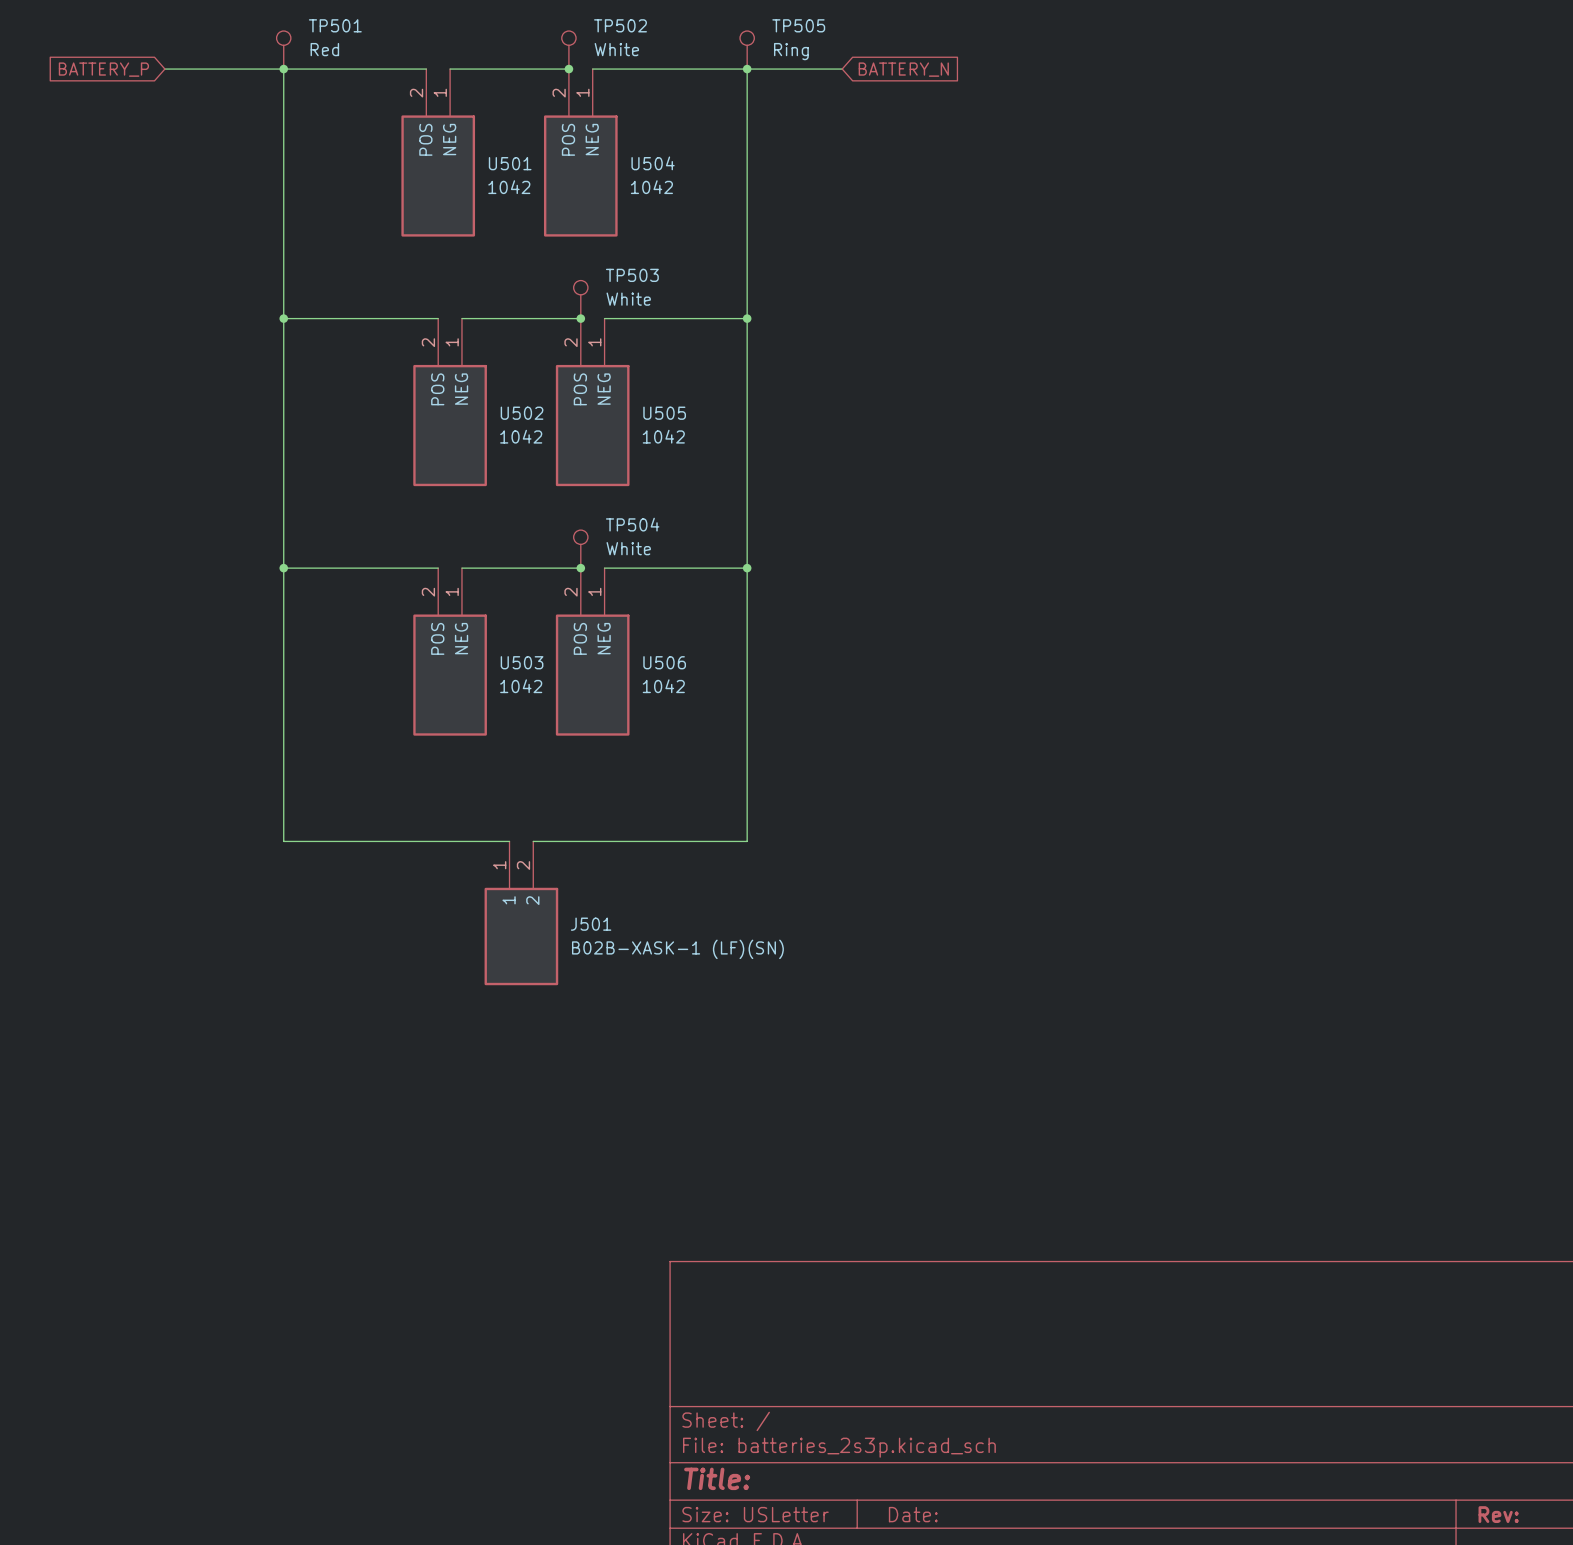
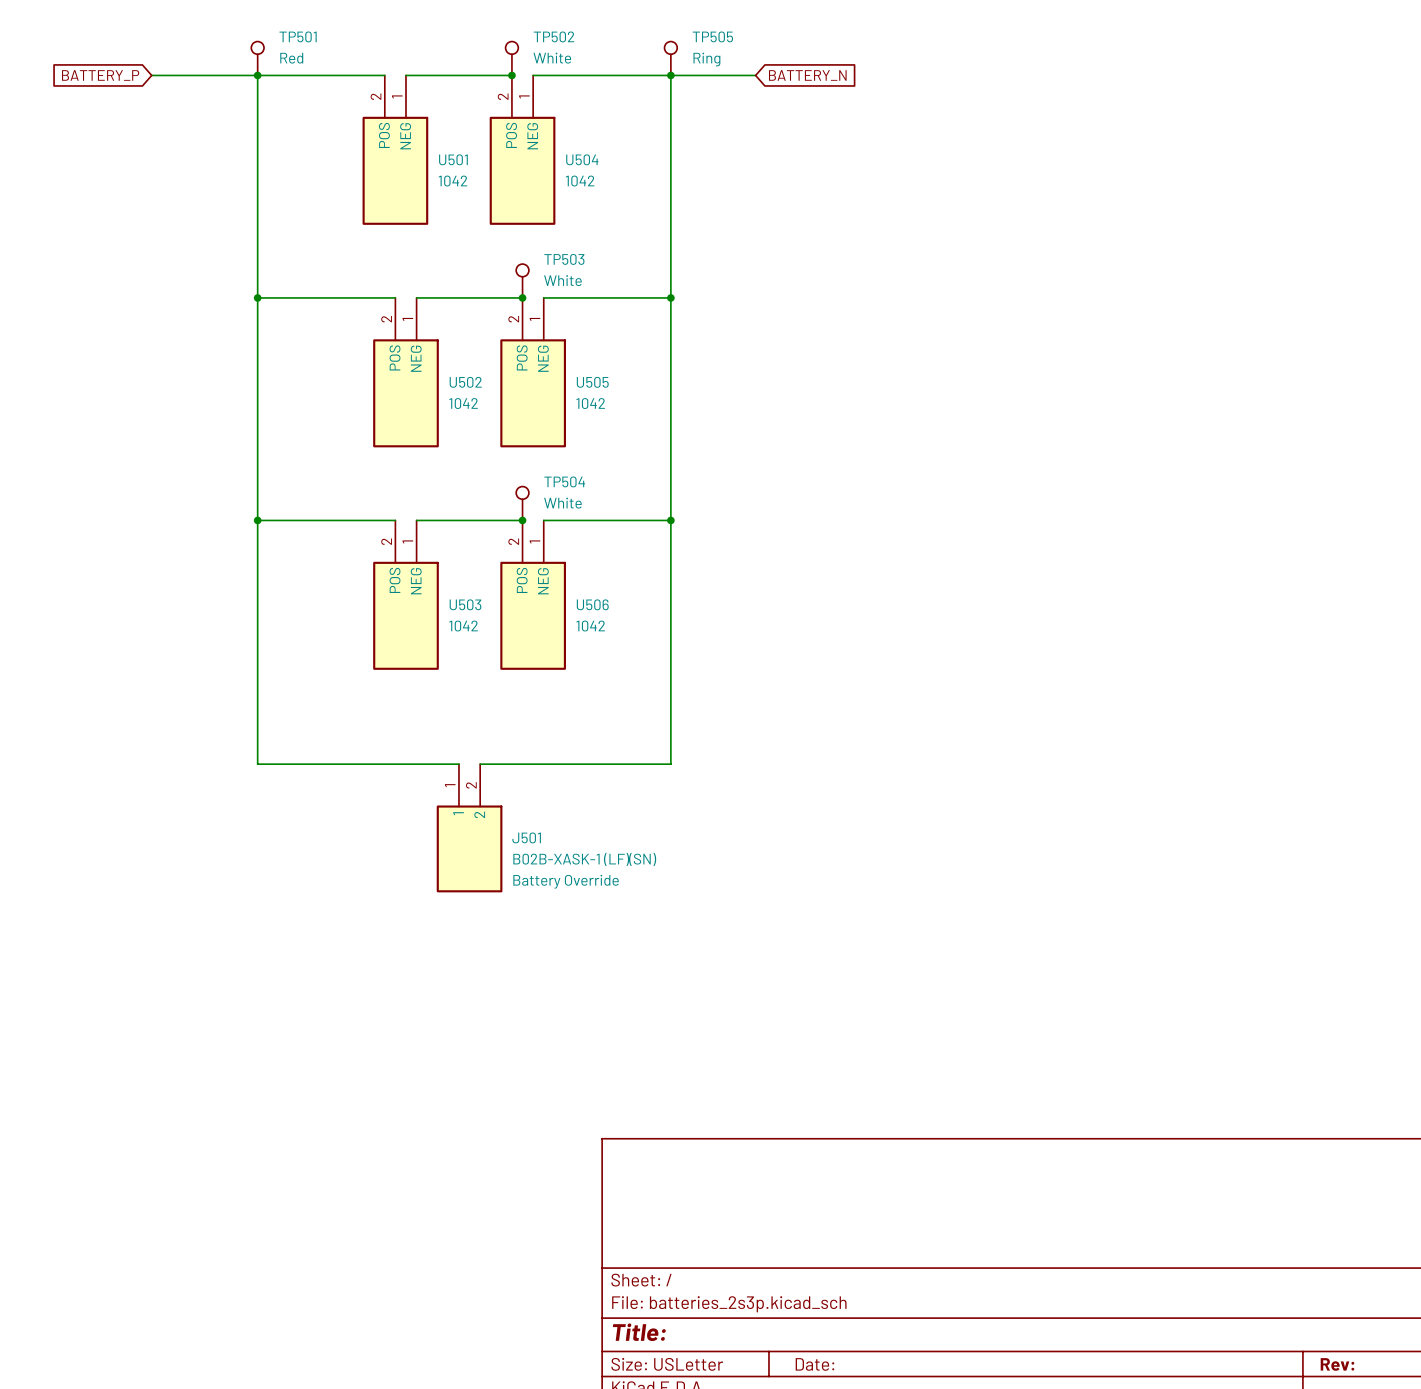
J501 text: none -> Battery Override (566, 881)

